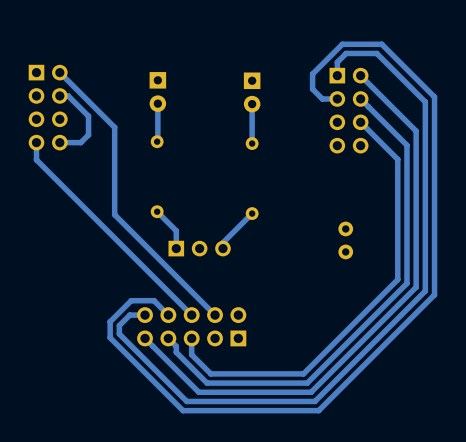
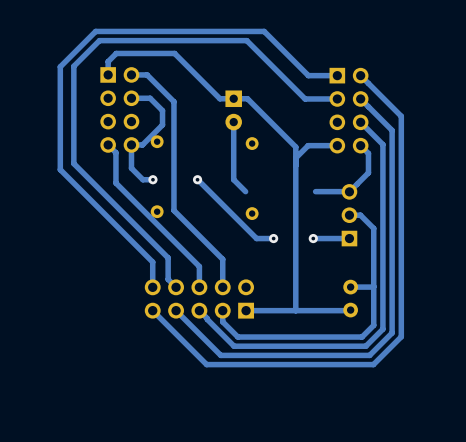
track: (59, 72) (114, 127) (114, 214) (215, 315) -> none
track: none -> (108, 74) (108, 61) (116, 53) (174, 53) (219, 98) (247, 98) (295, 147) (295, 310)
track: none -> (131, 74) (147, 74) (173, 101) (173, 210) (222, 259) (222, 287)
track: (337, 75) (337, 62) (346, 53) (376, 53) (425, 102) (425, 291) (314, 401) (186, 401) (119, 334) (119, 325) (129, 315) (145, 315) -> (337, 75) (308, 75) (264, 31) (95, 31) (60, 66) (60, 169) (152, 262) (152, 287)
part: (157, 91) -> none
part position: (252, 92) -> (233, 110)
track: (59, 95) (68, 95) (88, 116) (88, 134) (80, 142) (59, 142) -> none
track: none -> (131, 98) (150, 98) (162, 110) (162, 124) (142, 144) (131, 144) (131, 168) (142, 179) (152, 179)
track: (322, 98) (312, 89) (312, 74) (342, 44) (381, 44) (434, 96) (434, 294) (318, 410) (182, 410) (110, 337) (110, 321) (131, 300) (153, 300) (168, 315) -> (322, 98) (305, 98) (246, 40) (99, 40) (73, 66) (73, 163) (168, 257) (168, 279) (176, 287)
track: (157, 103) (157, 141) -> none
track: (252, 104) (252, 143) -> none
part position: (48, 107) -> (119, 109)
track: (401, 116) (416, 131) (416, 287) (311, 392) (198, 392) (145, 338) -> (401, 116) (401, 336) (373, 364) (206, 364) (152, 310)
track: none -> (233, 122) (233, 179) (245, 191)
track: (392, 130) (406, 145) (406, 283) (307, 383) (207, 383) (176, 352) (176, 346) (168, 338) -> (392, 130) (392, 332) (369, 355) (220, 355) (176, 310)
track: (36, 142) (36, 159) (191, 315) -> none
track: none -> (108, 144) (115, 152) (115, 183) (199, 266) (199, 287)
track: (382, 144) (397, 159) (397, 279) (303, 373) (210, 373) (191, 354) (191, 338) -> (382, 144) (382, 329) (365, 346) (234, 346) (199, 310)
track: none -> (337, 145) (308, 145) (295, 158)
track: none -> (360, 145) (368, 153) (368, 172) (349, 191) (315, 191)
via: none -> (152, 179)
track: none -> (197, 179) (256, 238) (273, 238)
via: none -> (197, 179)
track: (157, 211) (176, 230) (176, 248) -> none
track: (252, 213) (222, 242) (222, 248) -> none
track: none -> (349, 215) (360, 215) (373, 228) (373, 325) (362, 337) (237, 337) (222, 321) (222, 310)
via: none -> (273, 238)
via: none -> (313, 238)
track: none -> (349, 238) (313, 238)
part position: (345, 240) -> (350, 298)
part rotation: 0° (199, 248) -> 90° counterclockwise (349, 215)
part position: (199, 248) -> (349, 215)
track: none -> (373, 286) (350, 287)
track: none -> (350, 310) (246, 310)
part position: (191, 326) -> (199, 298)

